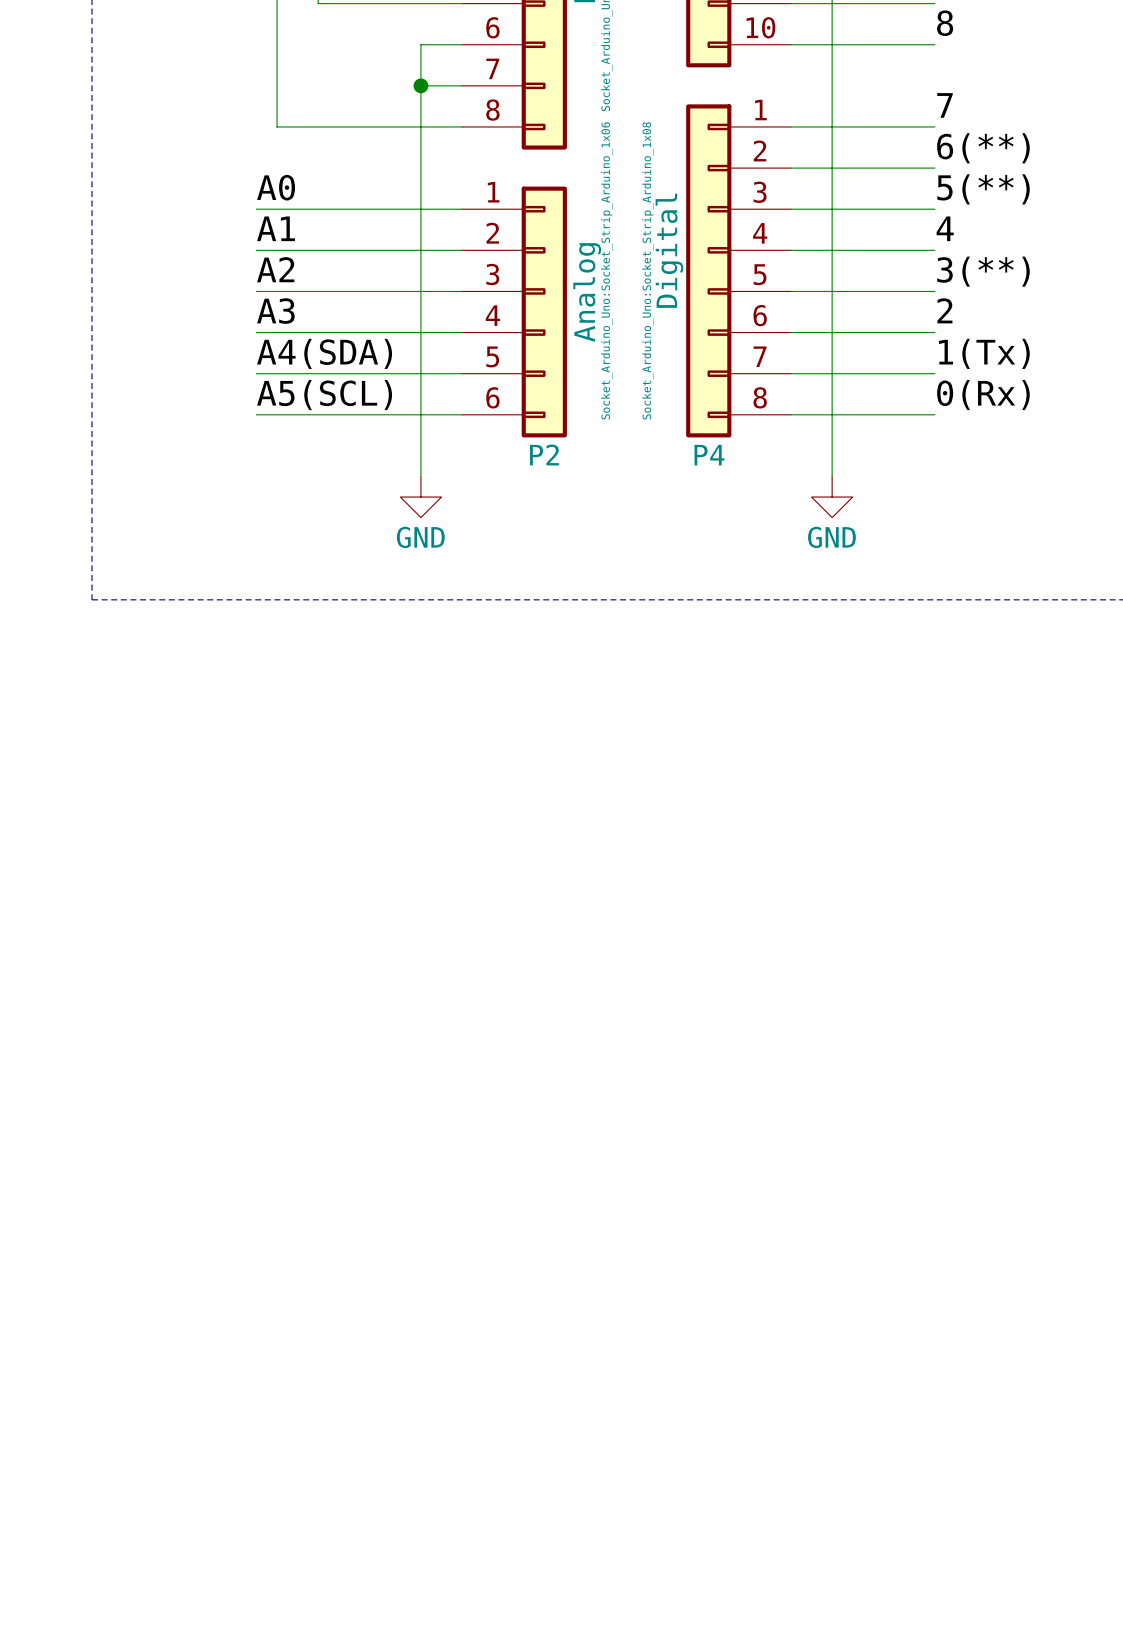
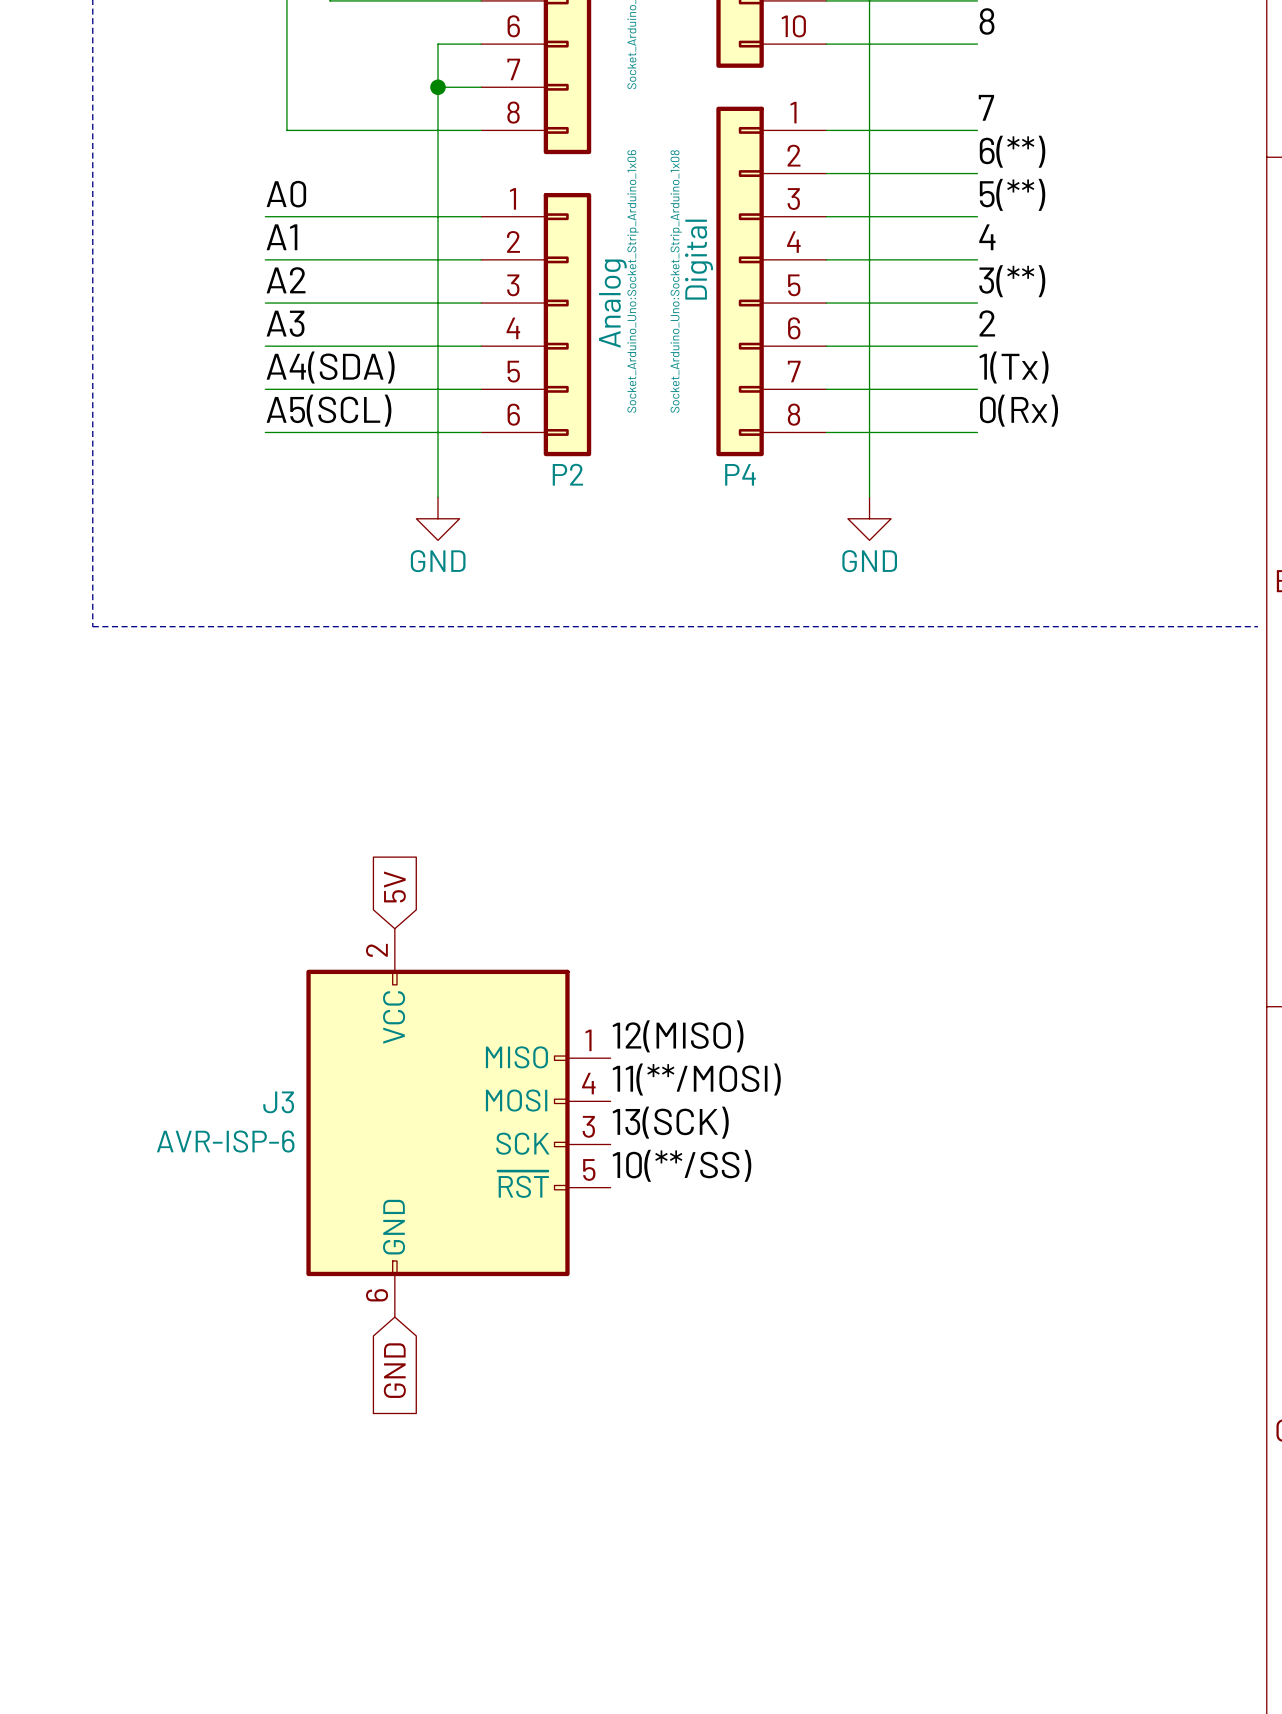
global label: none -> 5V (394, 886)
label: none -> 12(MISO) (678, 1036)
label: none -> 11(**/MOSI) (696, 1079)
J3: none -> AVR-ISP-6 (458, 1122)
label: none -> 13(SCK) (670, 1122)
label: none -> 10(**/SS) (682, 1165)
global label: none -> GND (394, 1370)

